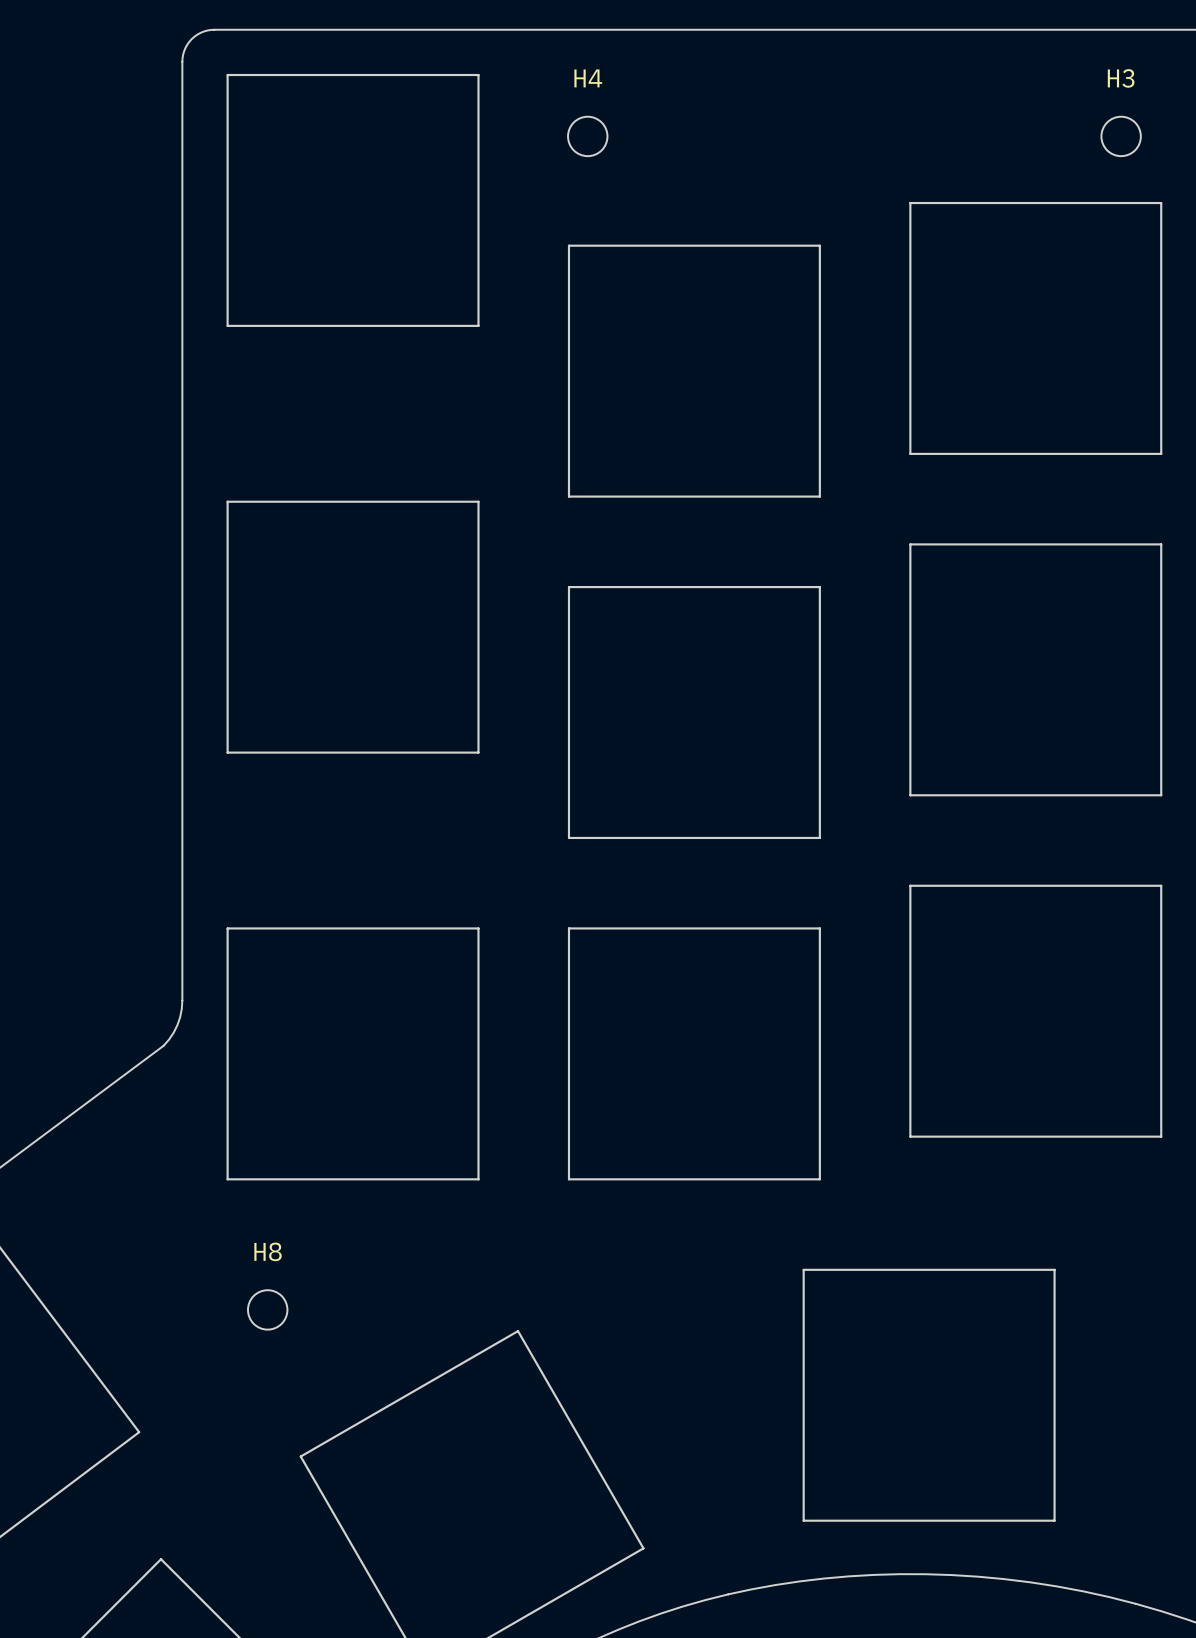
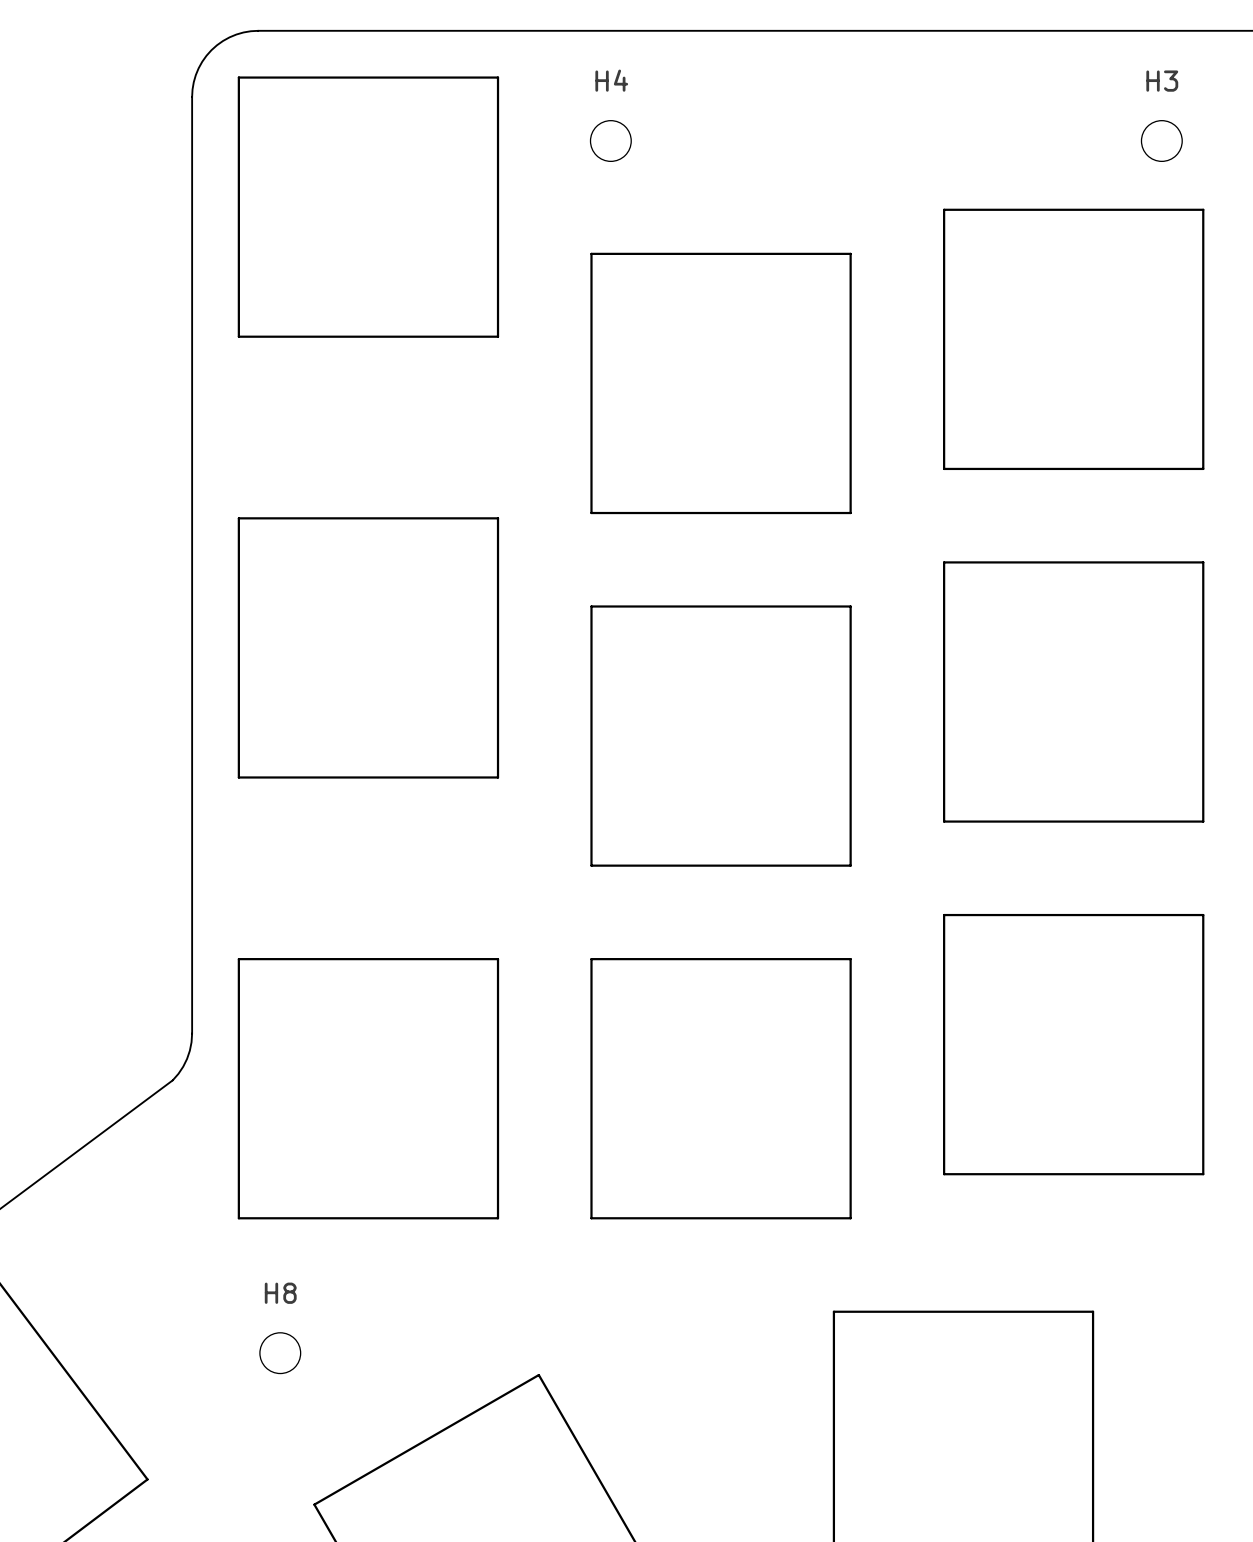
board edge: (246, 29) (210, 29) (200, 32) (189, 41) (182, 58) (182, 1000) -> (258, 30) (243, 32) (229, 37) (211, 50) (198, 68) (192, 89) (192, 1033)

